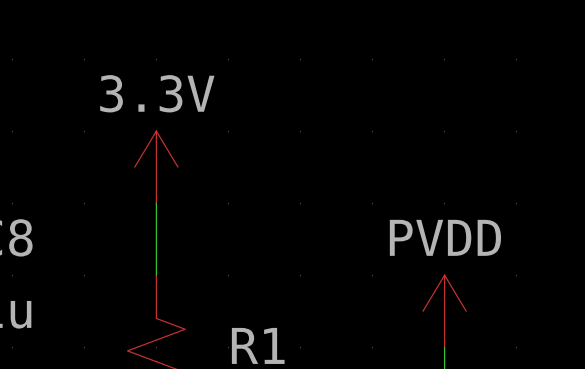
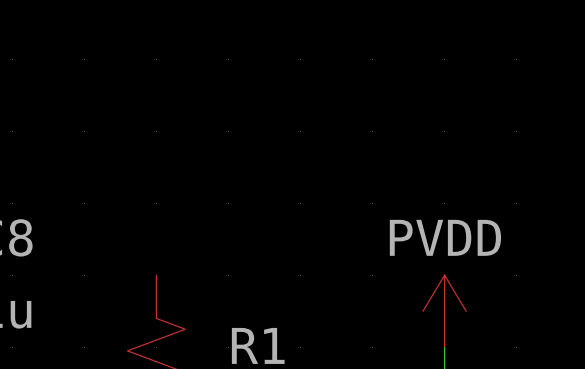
power symbol: 3.3V (156, 167) -> none
wire: (156, 203) (156, 275) -> none

